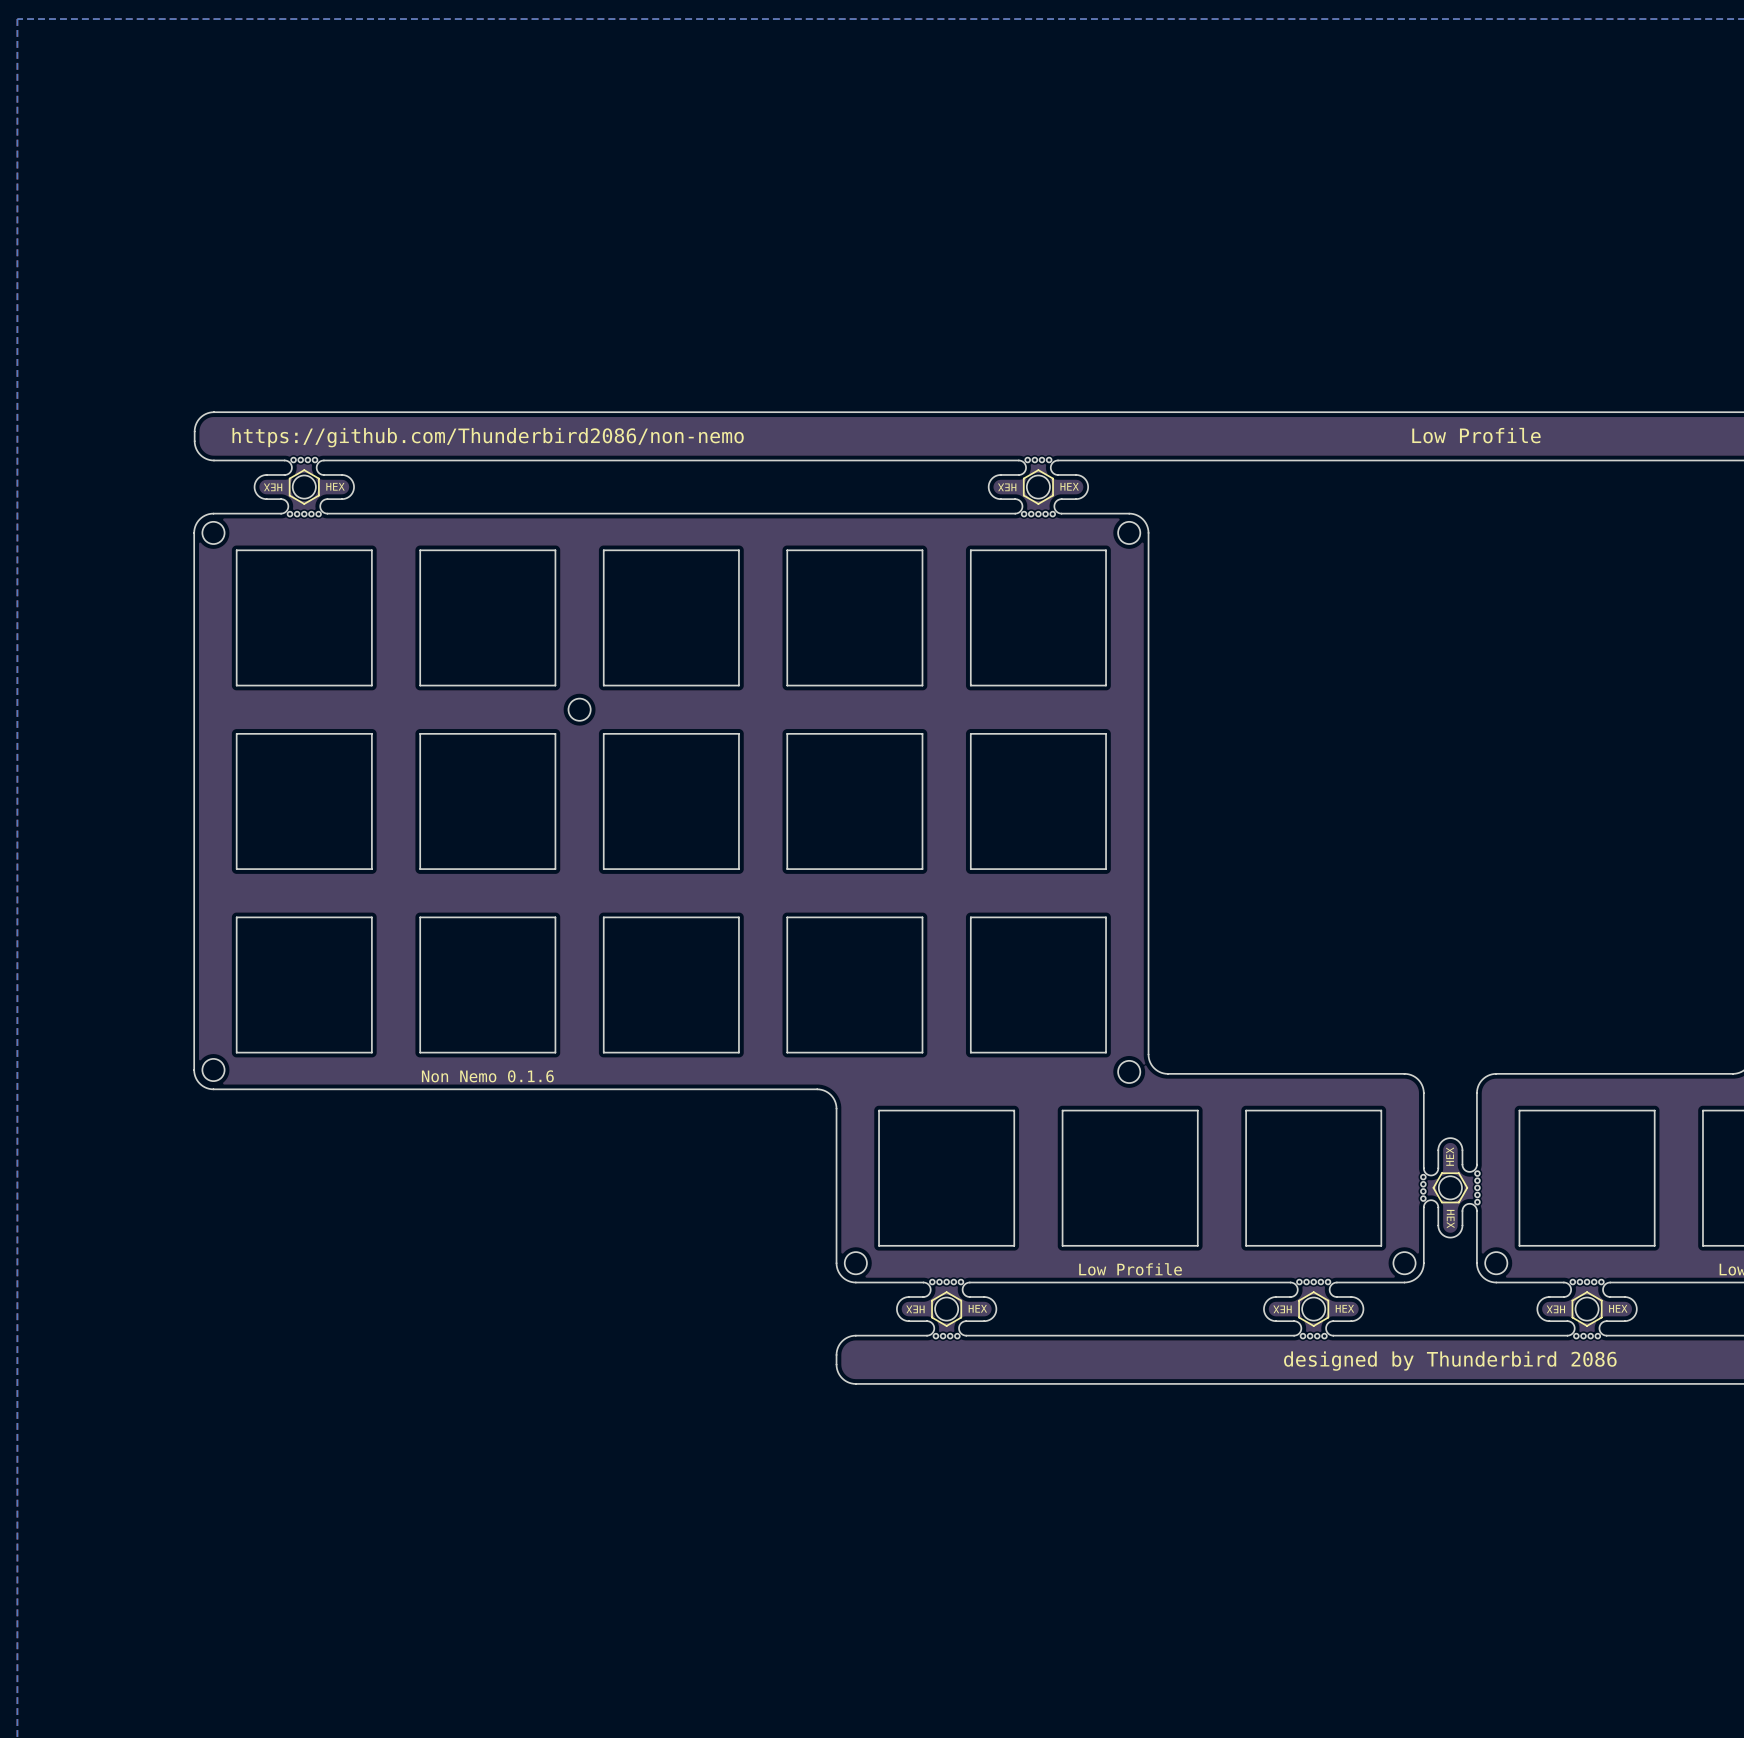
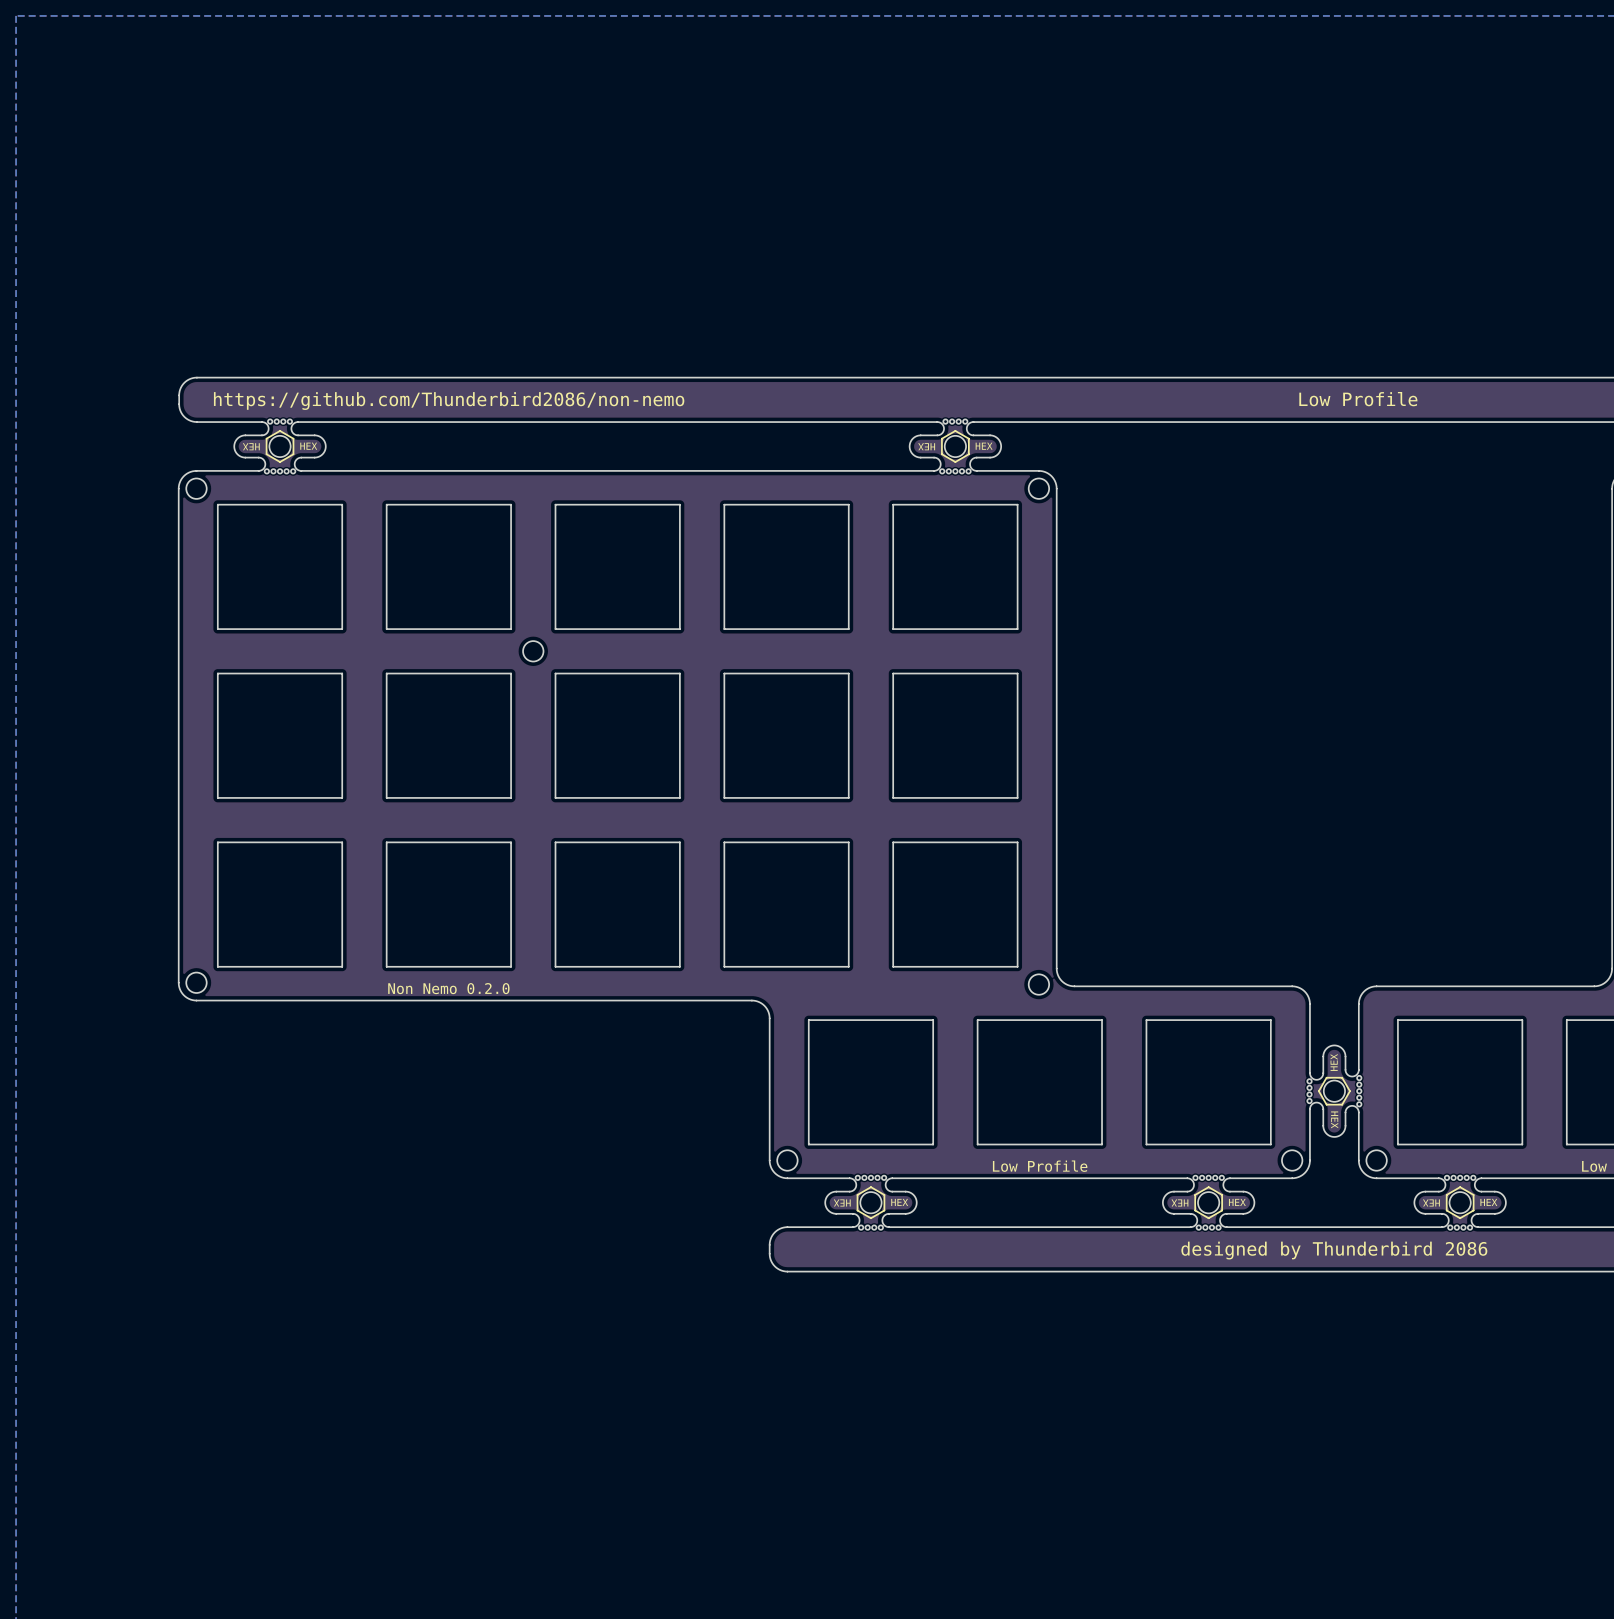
text: Non Nemo 0.1.6 (487, 1076) -> Non Nemo 0.2.0 (448, 988)

